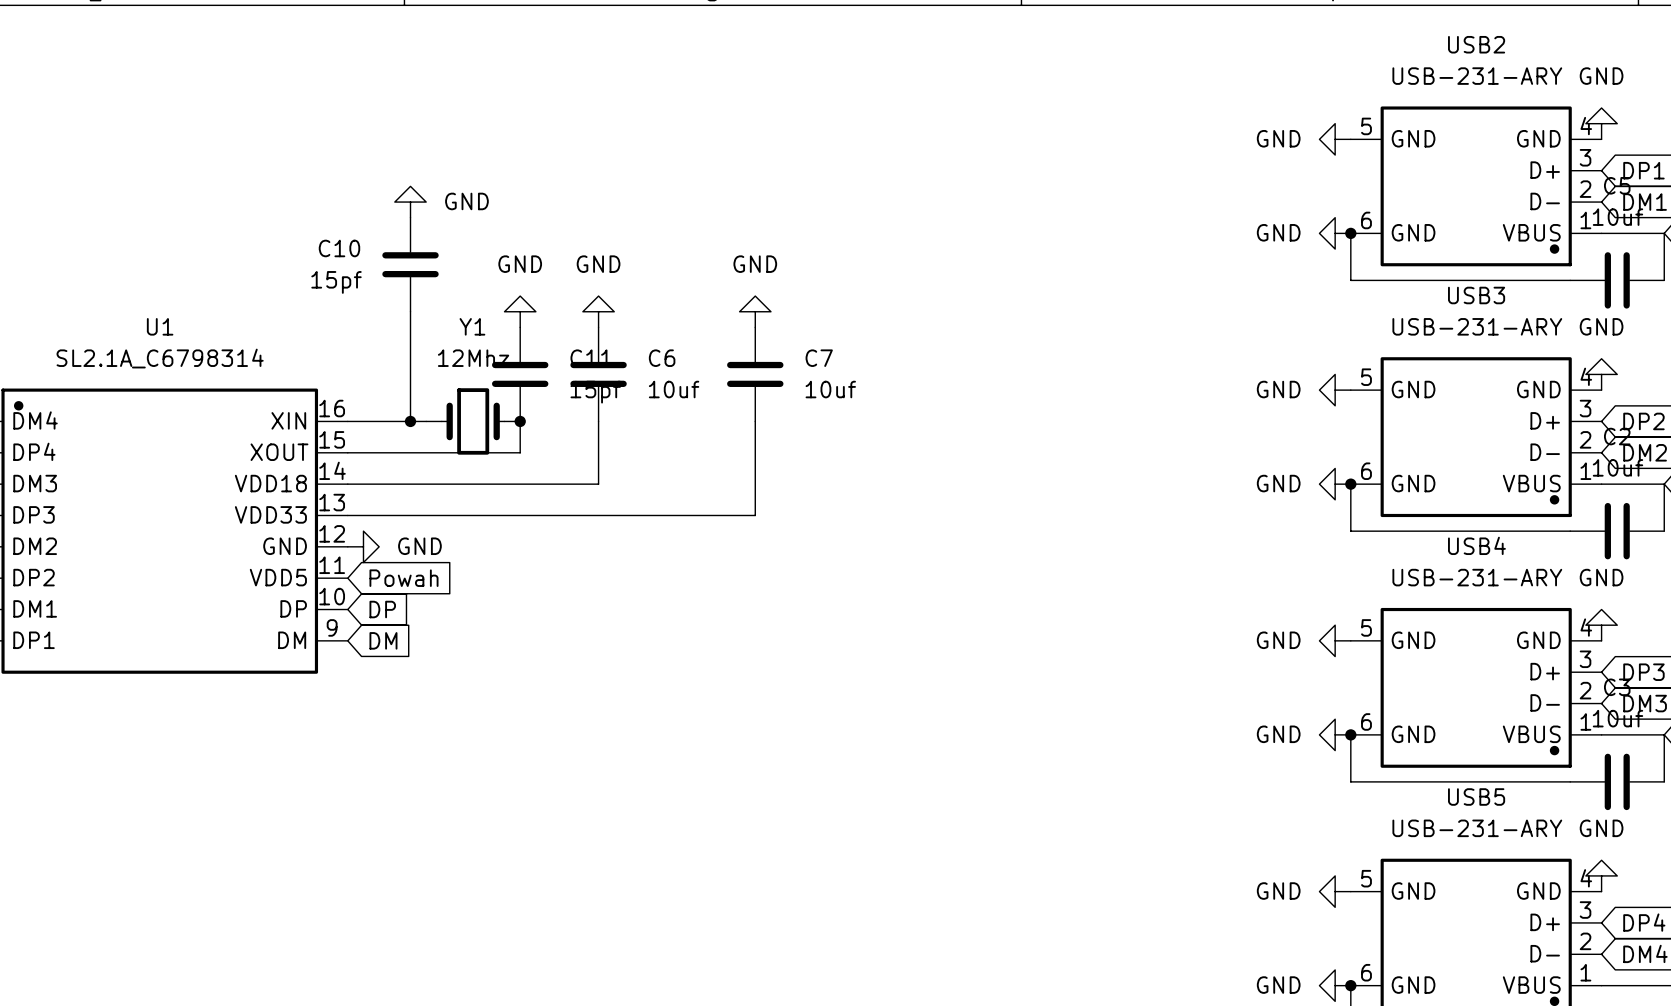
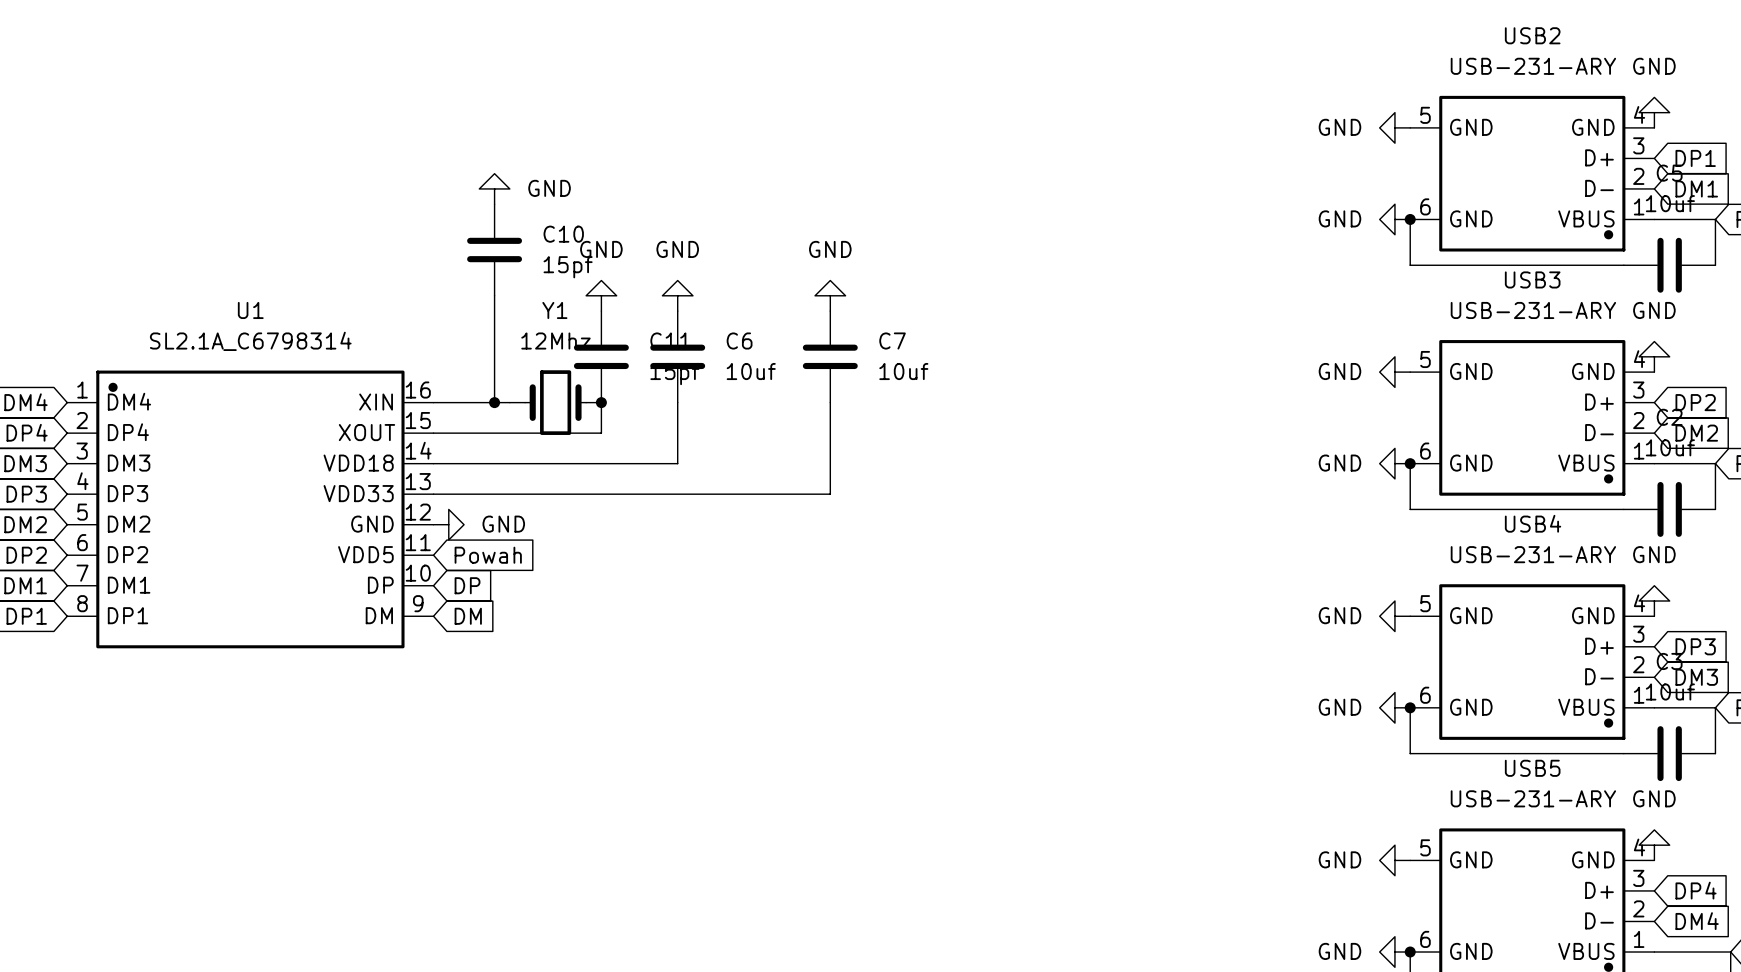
C10 name position: C10 (339, 248) -> C10 (563, 234)
C10 value position: 15pf (336, 282) -> 15pf (568, 267)

